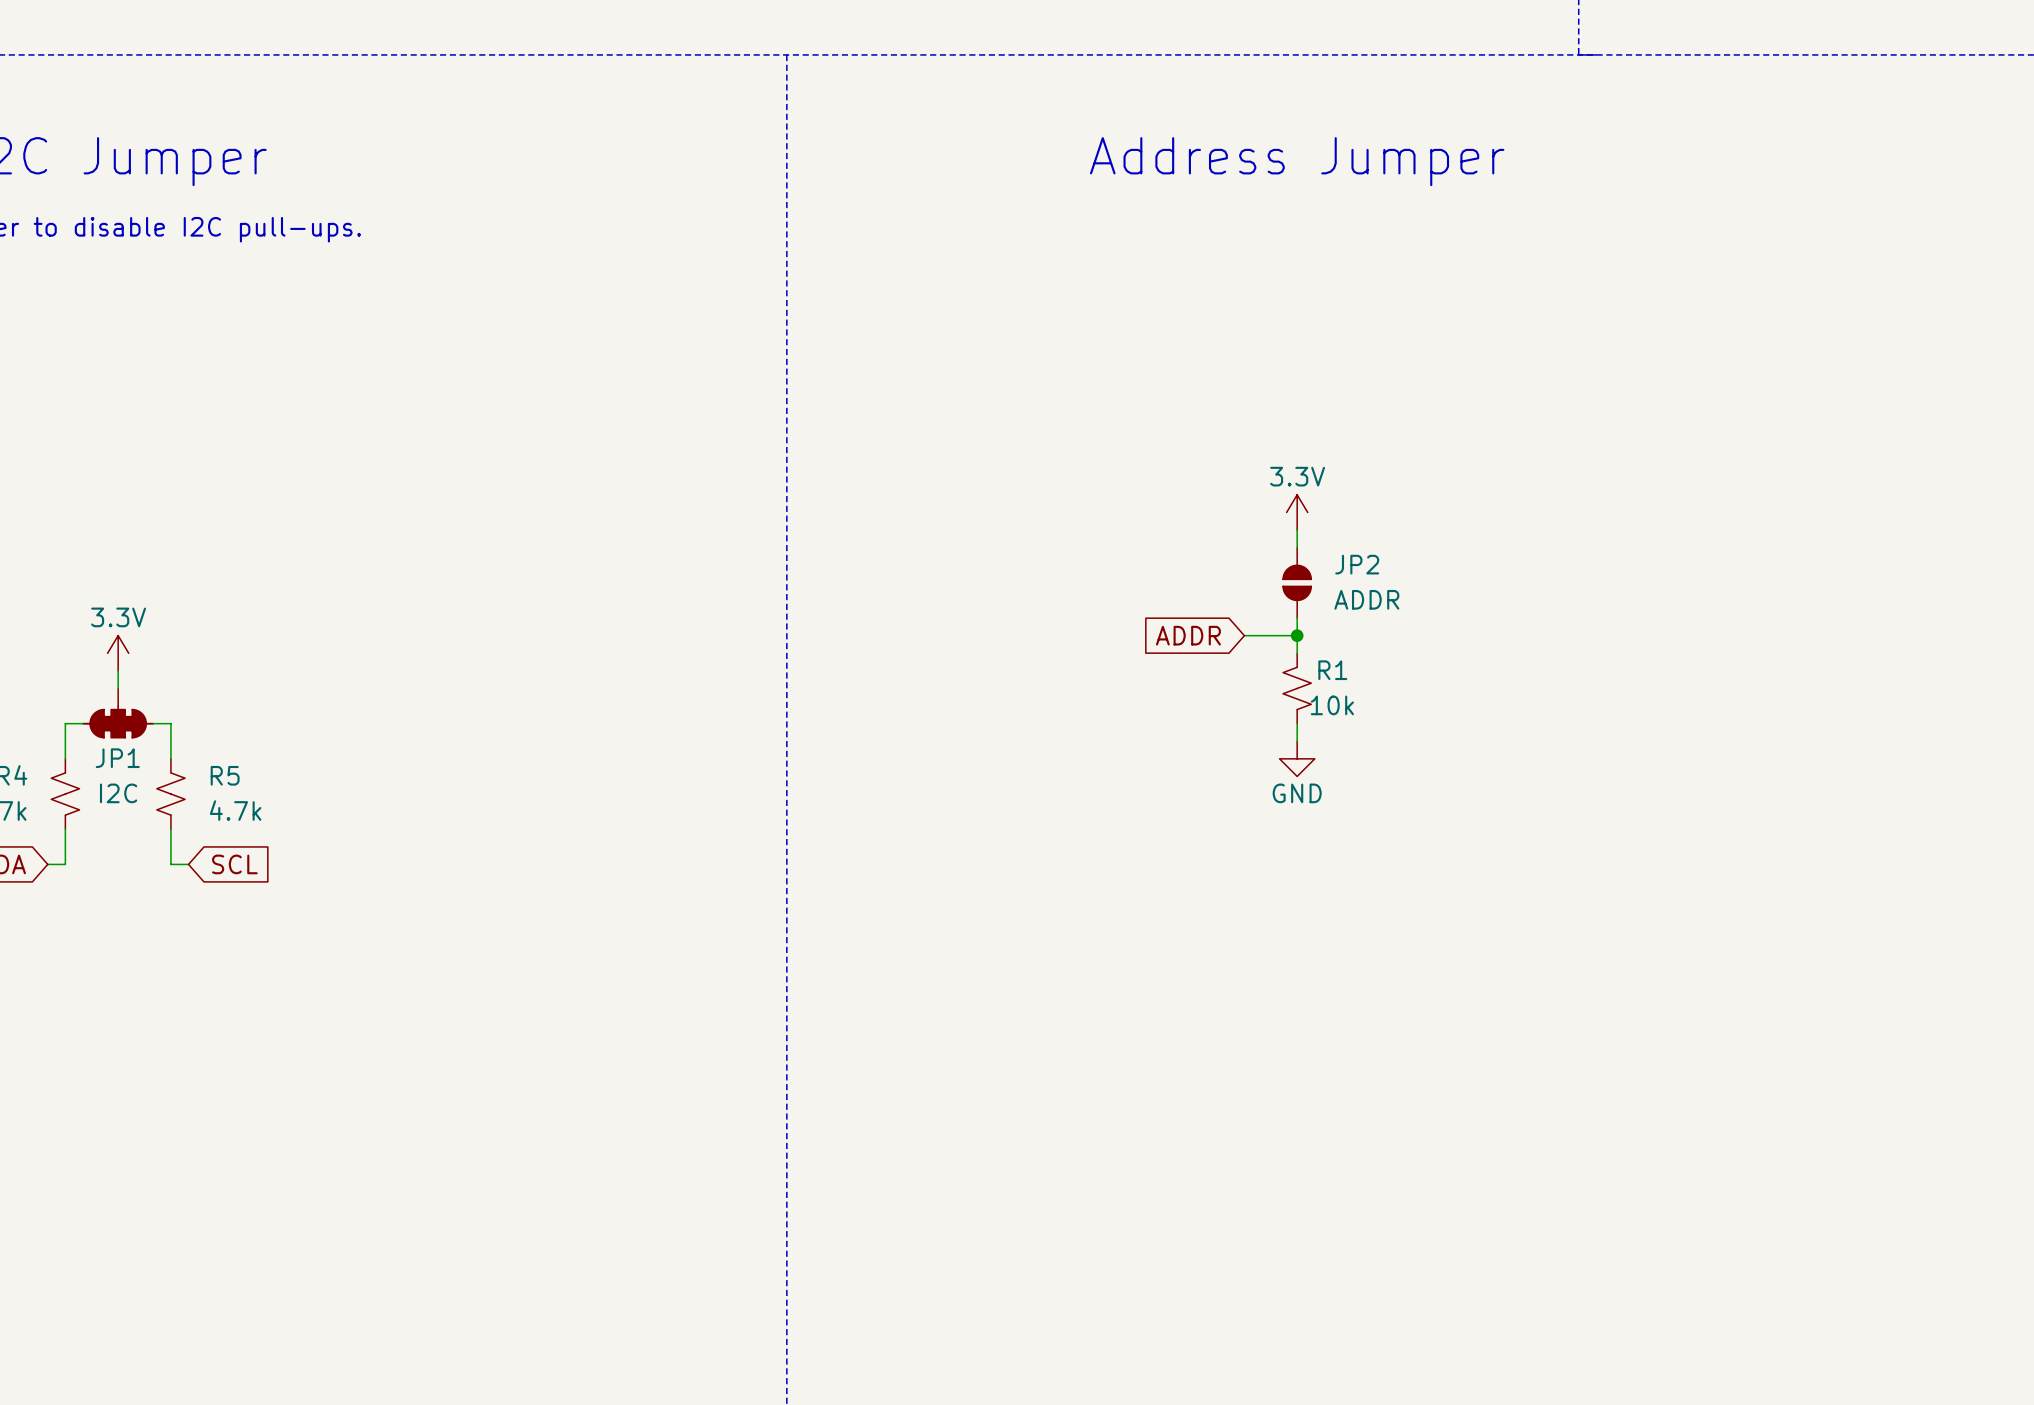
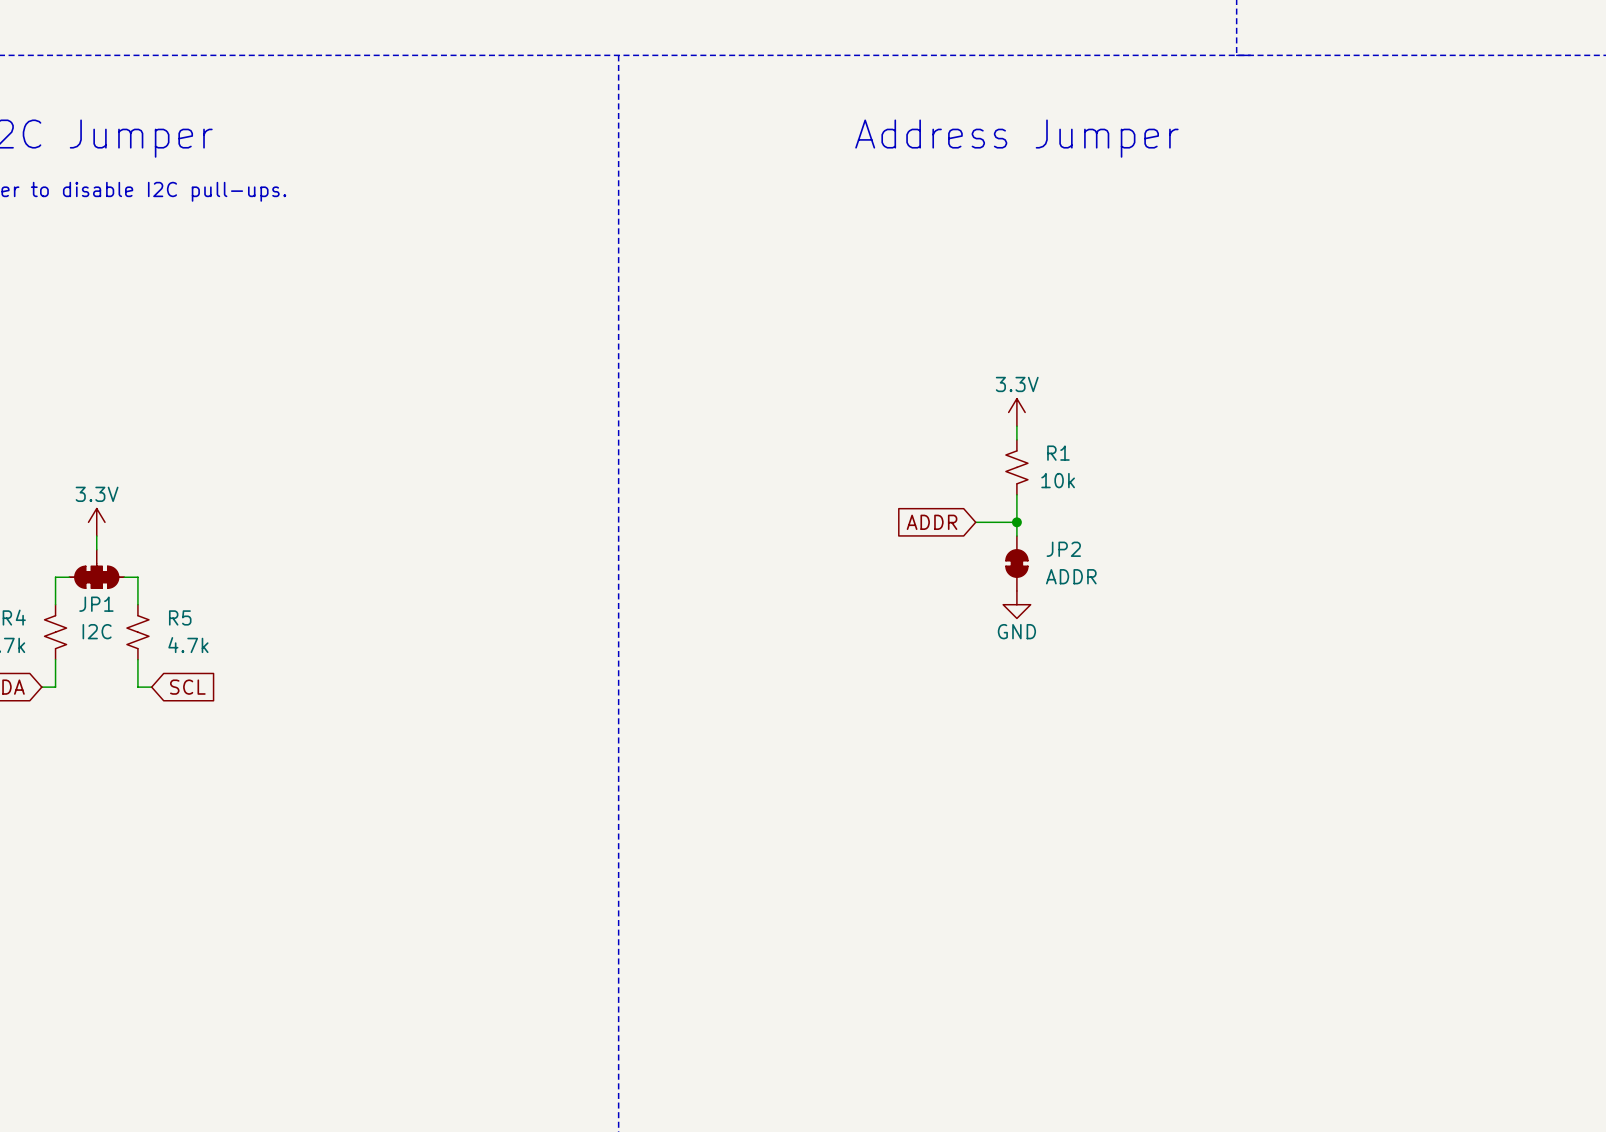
JP2 symbol: [1283, 547, 1312, 619] -> [1005, 536, 1028, 591]
global label position: ADDR (1188, 635) -> ADDR (932, 522)
wire: (1244, 635) (1297, 635) -> none
junction position: (1297, 635) -> (1016, 522)
wire: none -> (975, 522) (1016, 522) (1016, 536)
R1 name position: R1 (1332, 670) -> R1 (1058, 453)
R1 position: (1297, 688) -> (1016, 467)
R1 value position: 10k (1332, 705) -> 10k (1058, 480)

